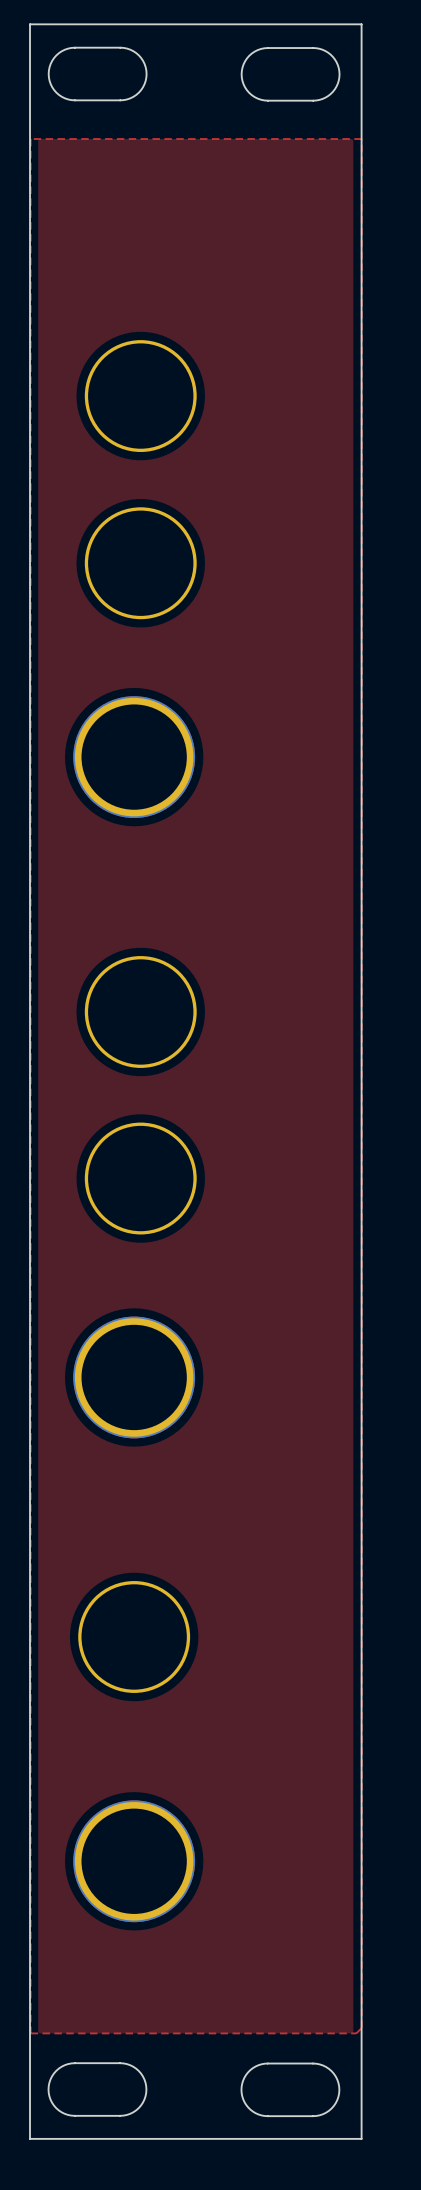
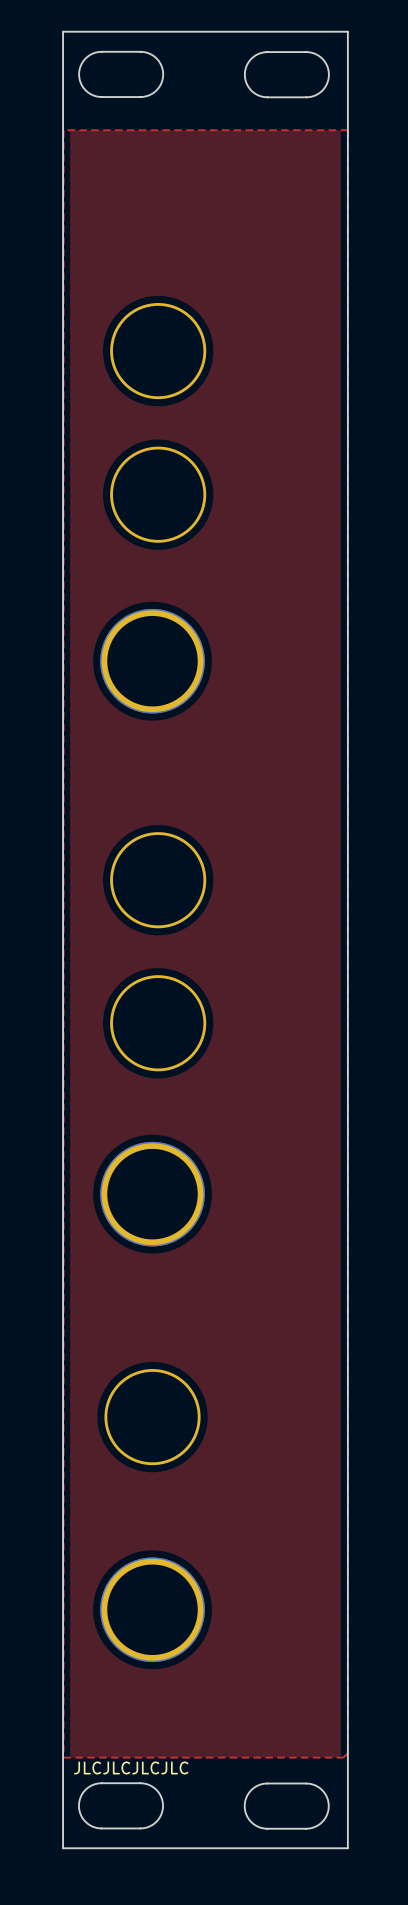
text: none -> JLCJLCJLCJLC (131, 1767)

